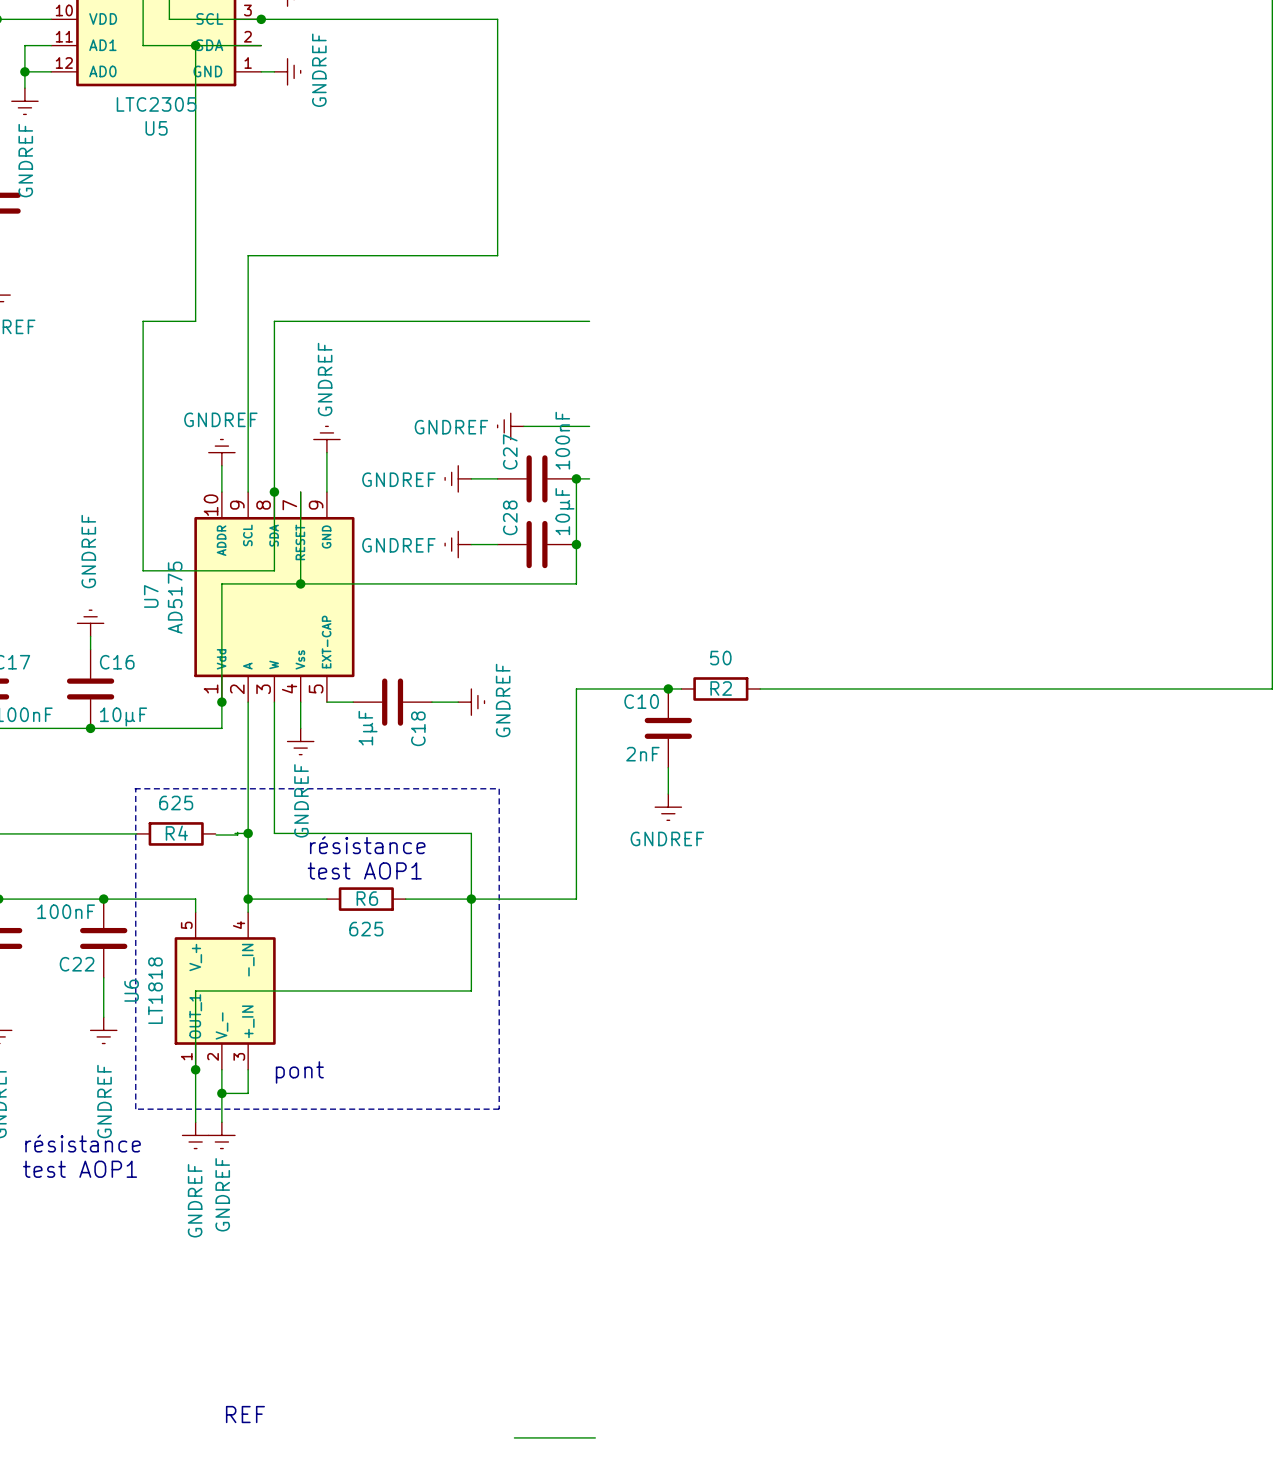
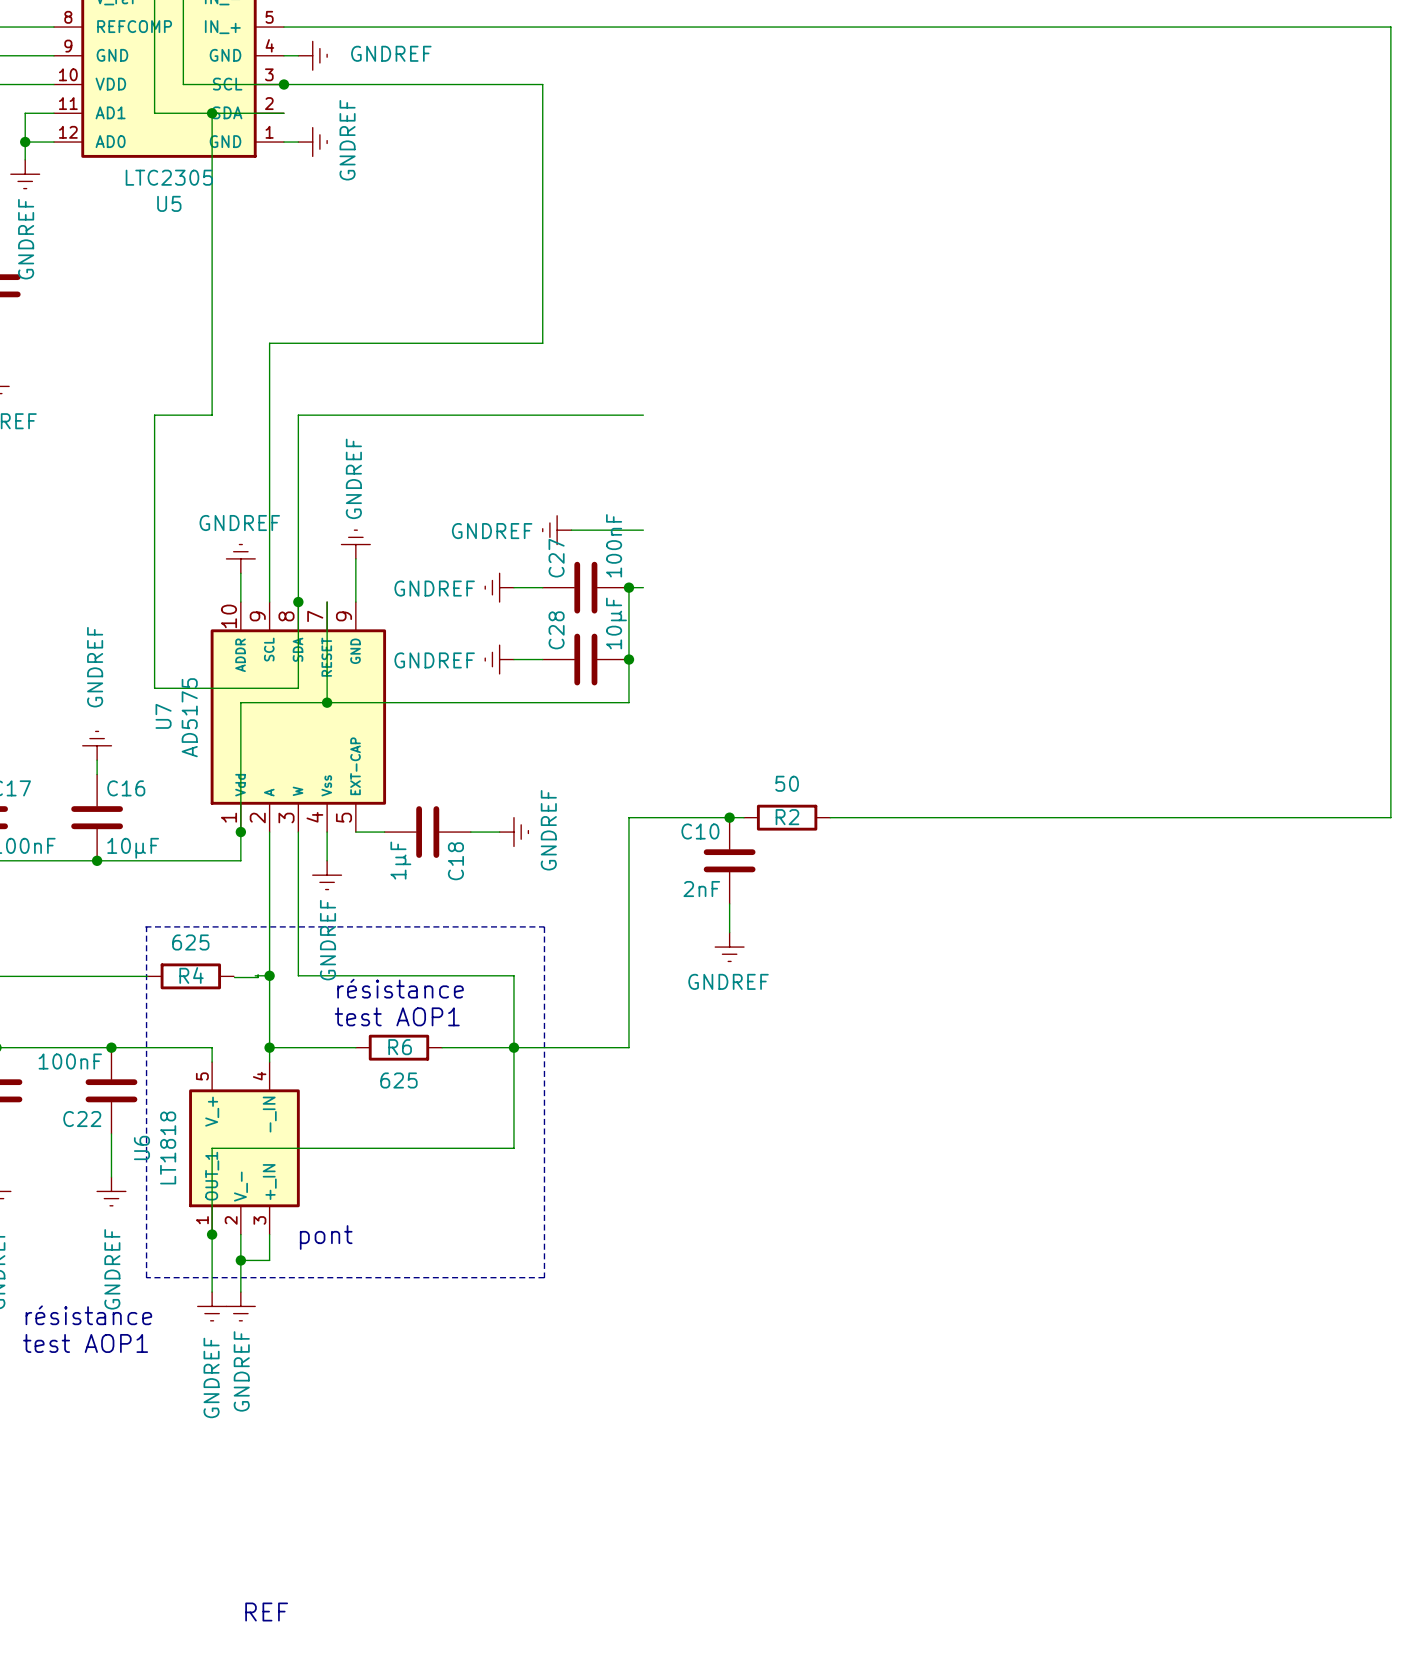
wire: (514, 1437) (595, 1437) -> none

